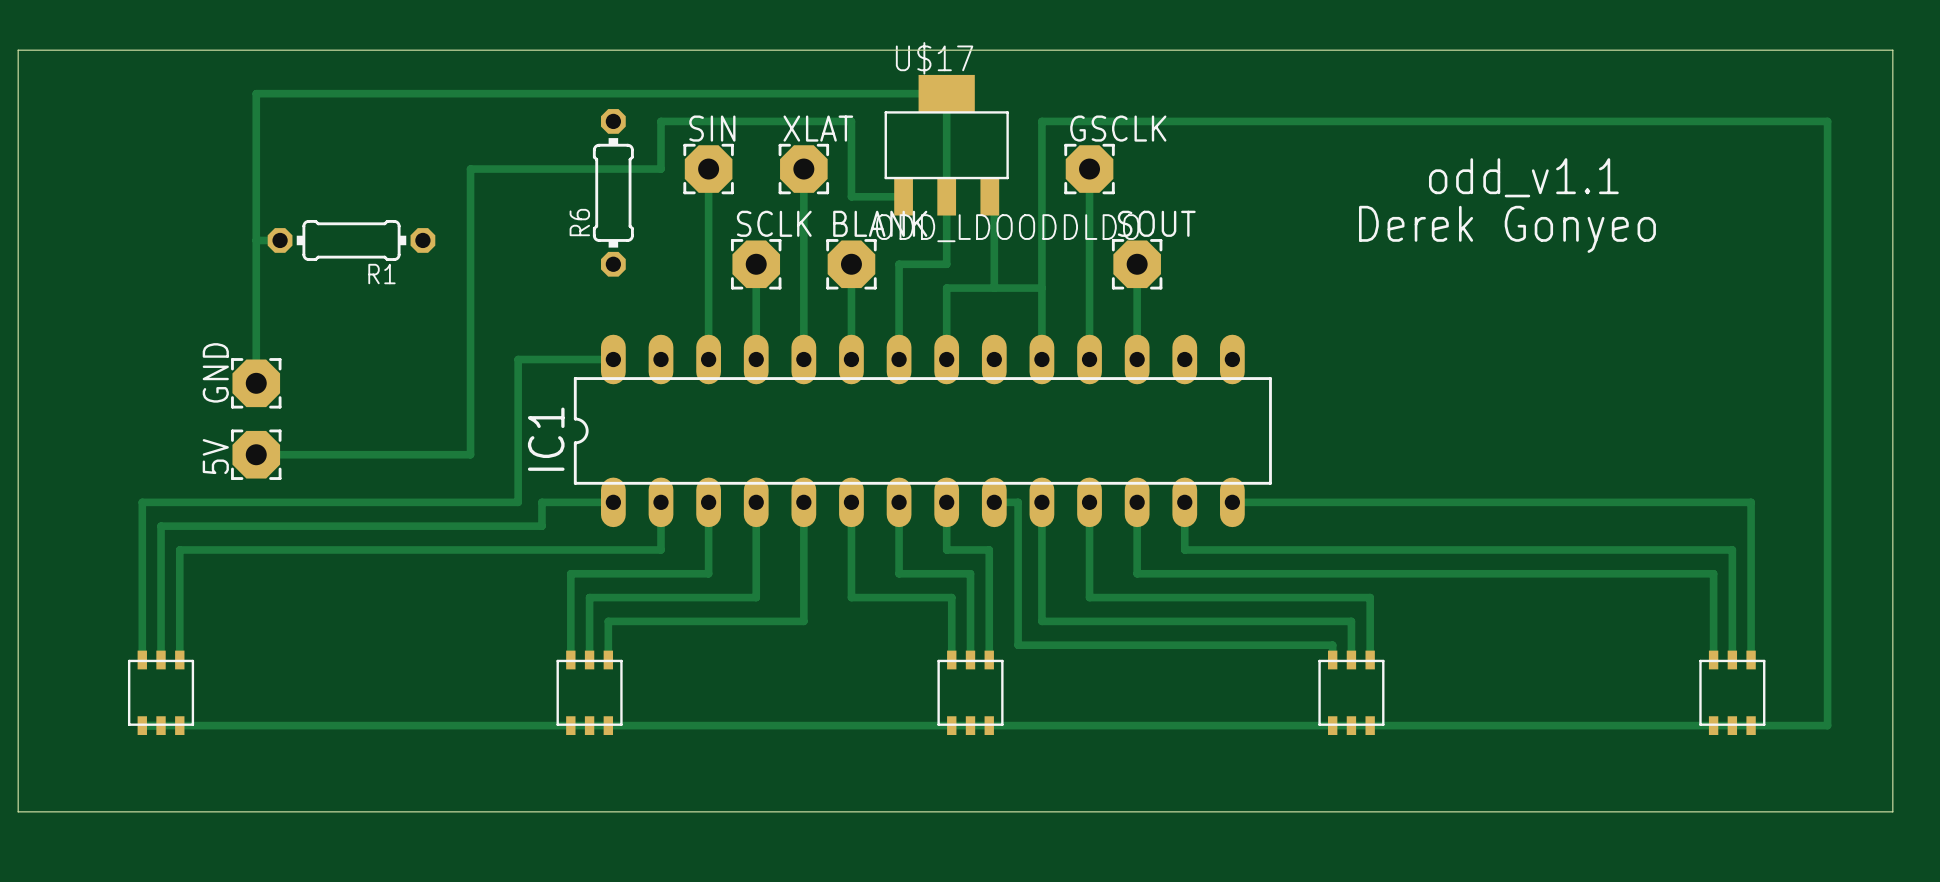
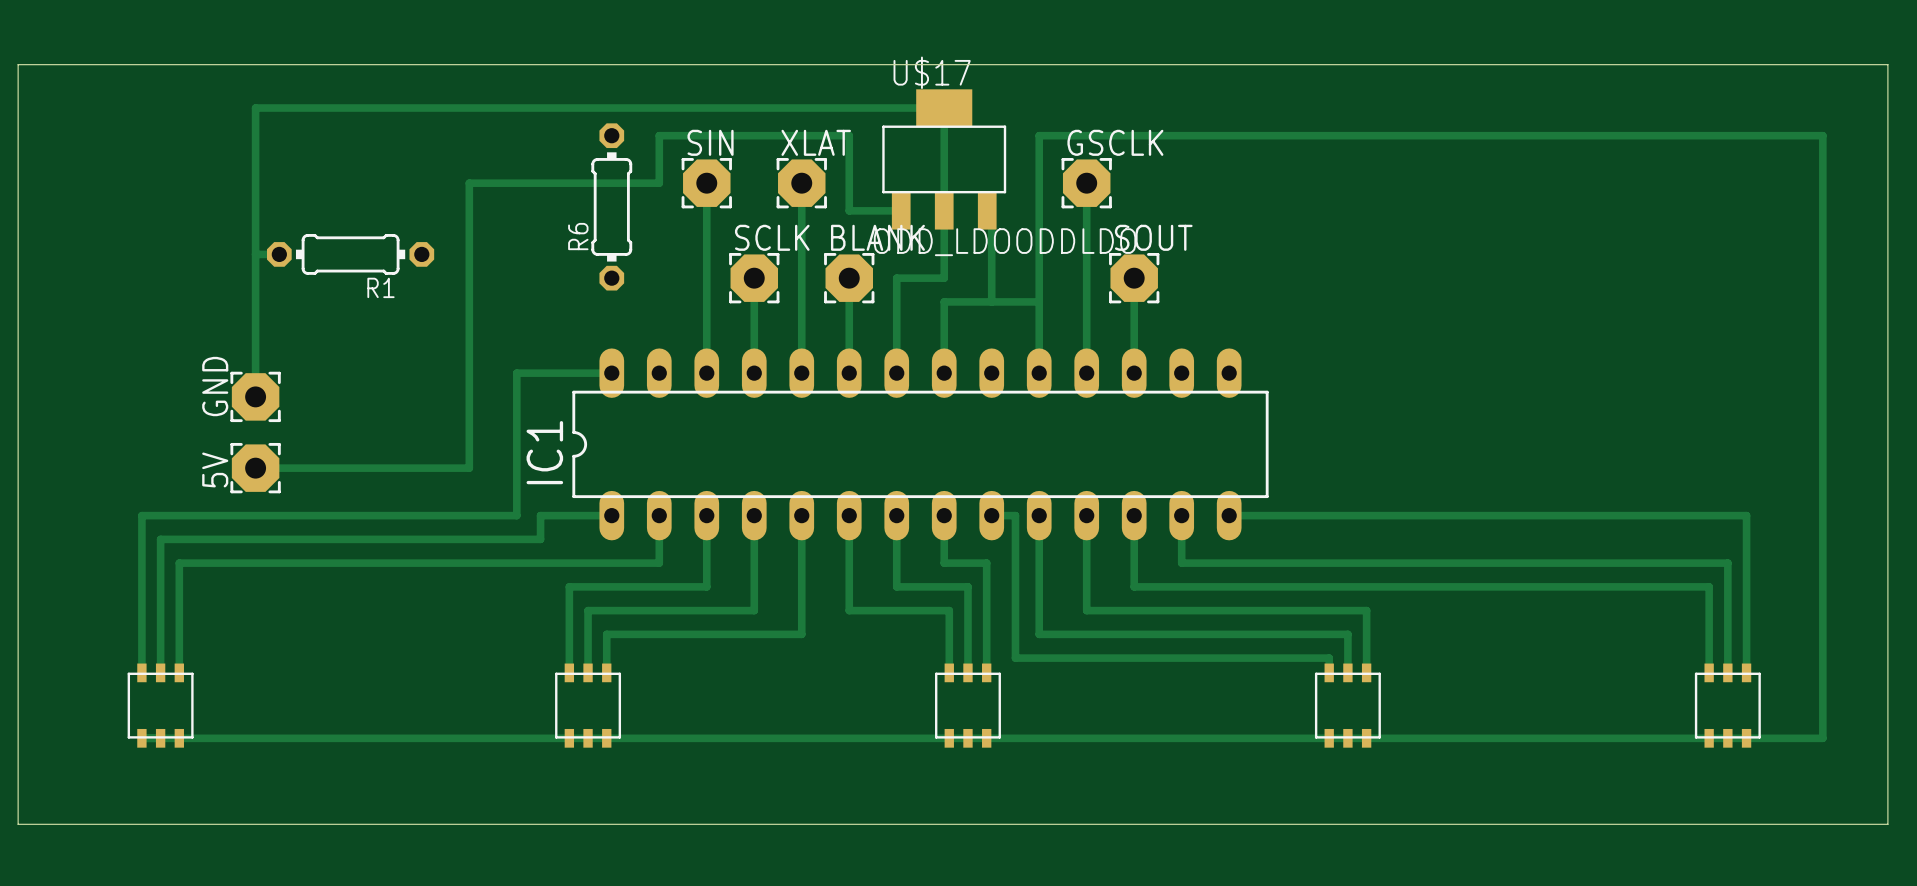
text: odd_v1.1 (1523, 177) -> none
text: Derek Gonyeo (1507, 229) -> none

